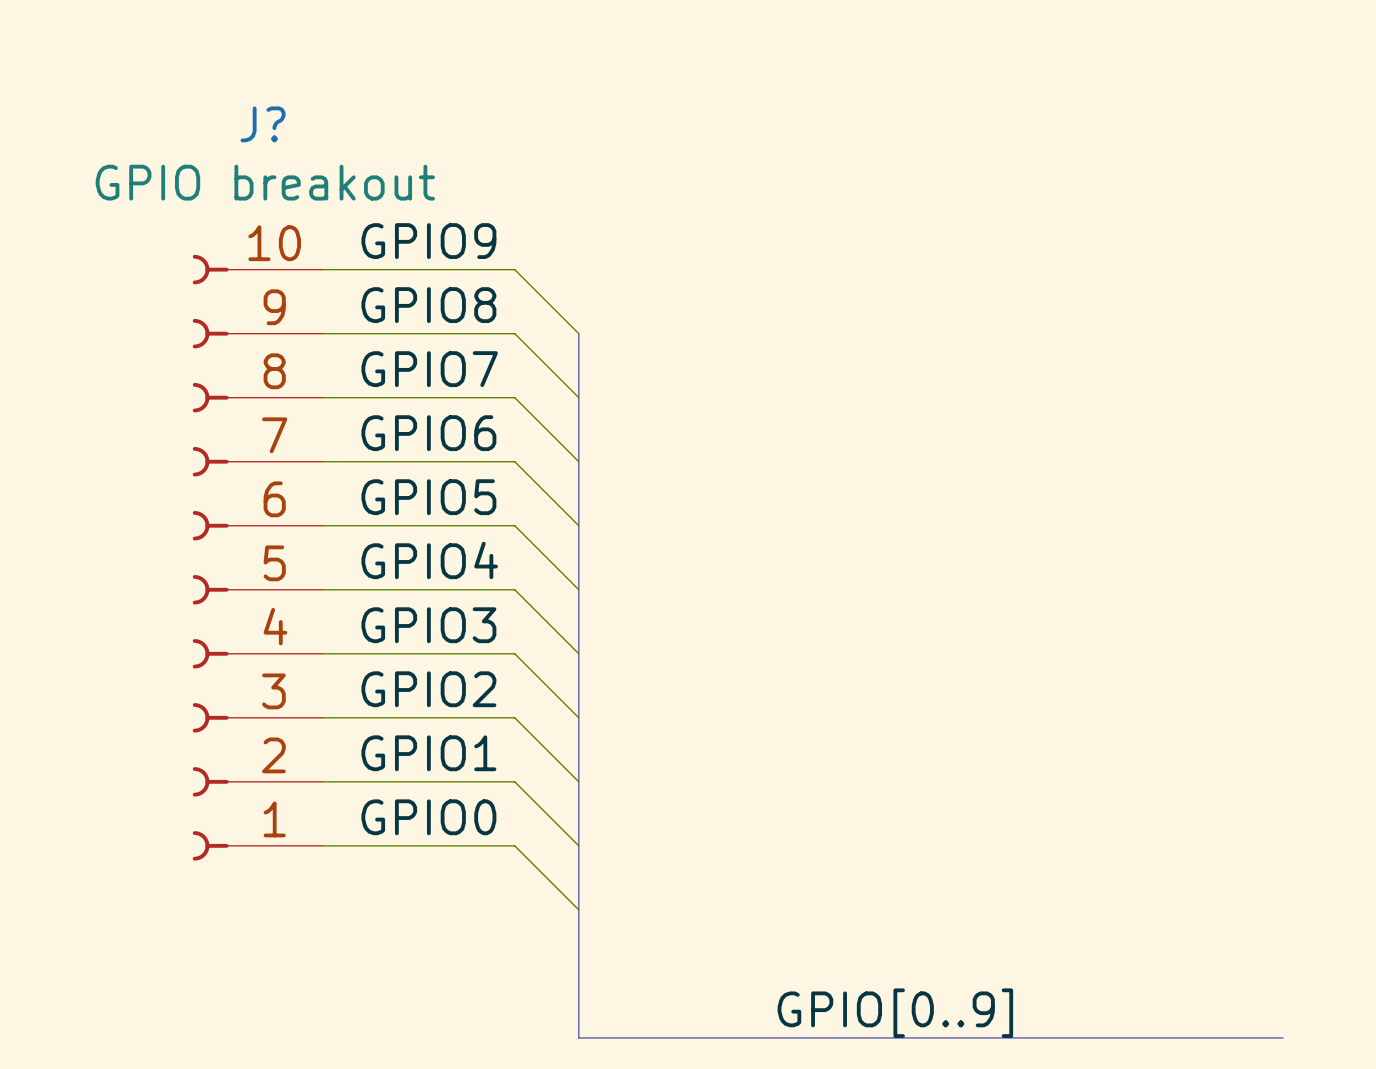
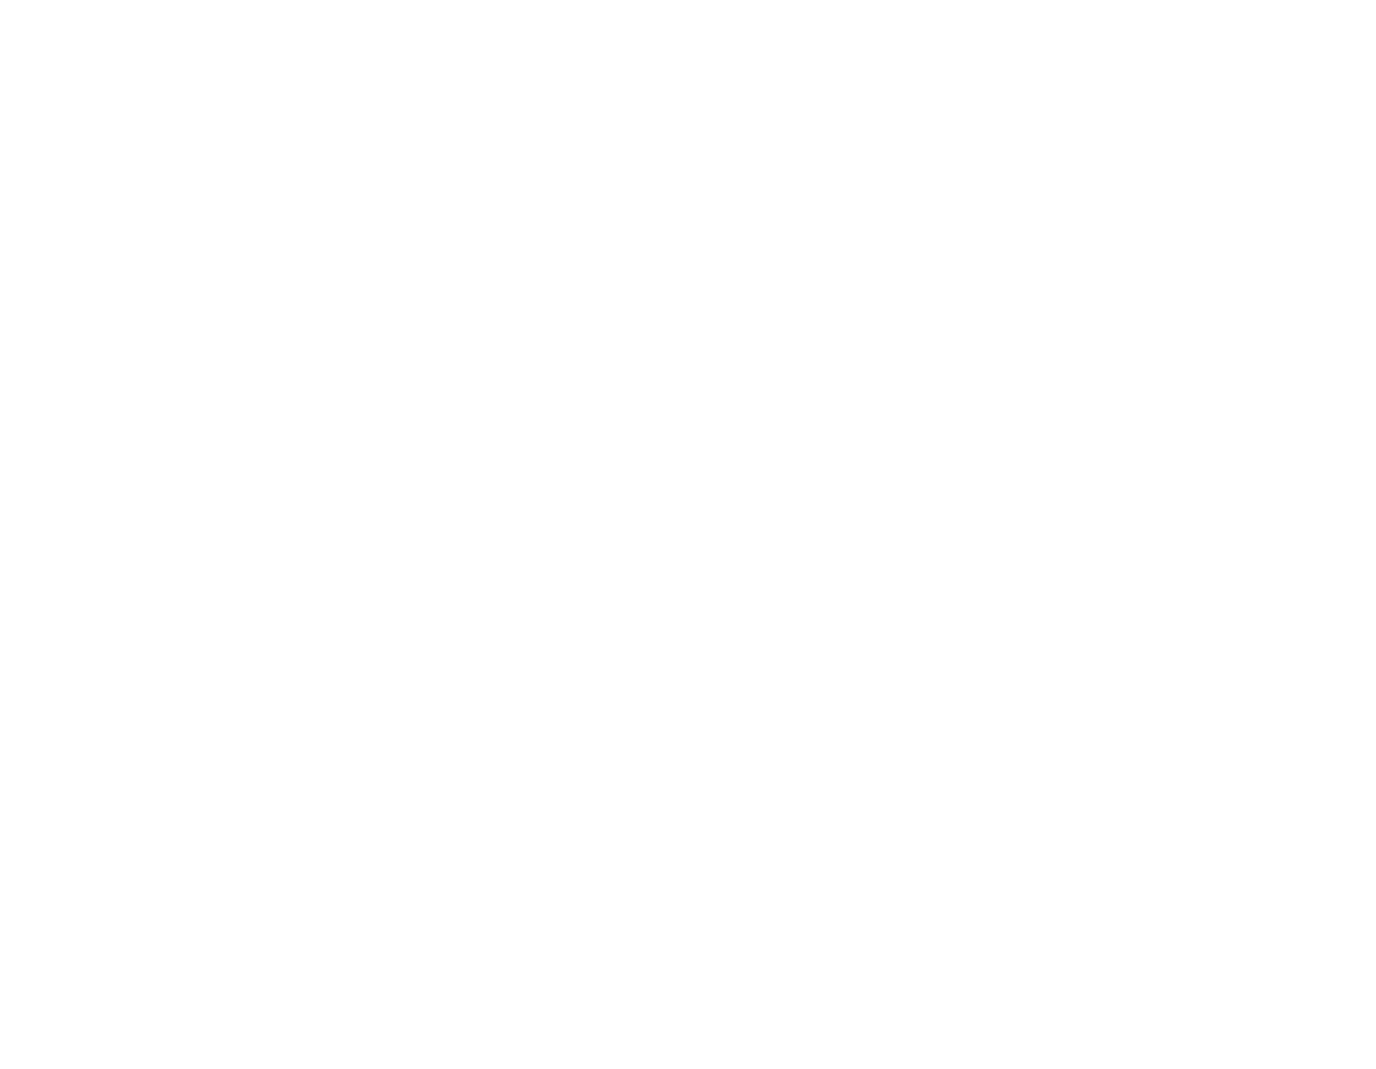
label: GPIO9 (428, 241) -> none
wire: (322, 269) (514, 269) (578, 333) -> none
label: GPIO8 (428, 305) -> none
wire: (322, 333) (514, 333) (578, 397) -> none
bus: (578, 333) (578, 1037) (1283, 1037) -> none
label: GPIO7 (429, 369) -> none
wire: (322, 397) (514, 397) (578, 461) -> none
label: GPIO6 (428, 433) -> none
wire: (322, 461) (514, 461) (578, 525) -> none
label: GPIO5 (428, 497) -> none
wire: (322, 525) (514, 525) (578, 589) -> none
J?: GPIO breakout (257, 557) -> none
label: GPIO4 (429, 560) -> none
wire: (322, 589) (514, 589) (578, 653) -> none
label: GPIO3 (428, 625) -> none
wire: (322, 653) (514, 653) (578, 717) -> none
label: GPIO2 (428, 689) -> none
wire: (322, 717) (514, 717) (578, 781) -> none
label: GPIO1 (428, 753) -> none
wire: (322, 781) (514, 781) (578, 845) -> none
label: GPIO0 (428, 817) -> none
wire: (322, 845) (514, 845) (578, 909) -> none
label: GPIO[0..9] (895, 1013) -> none

